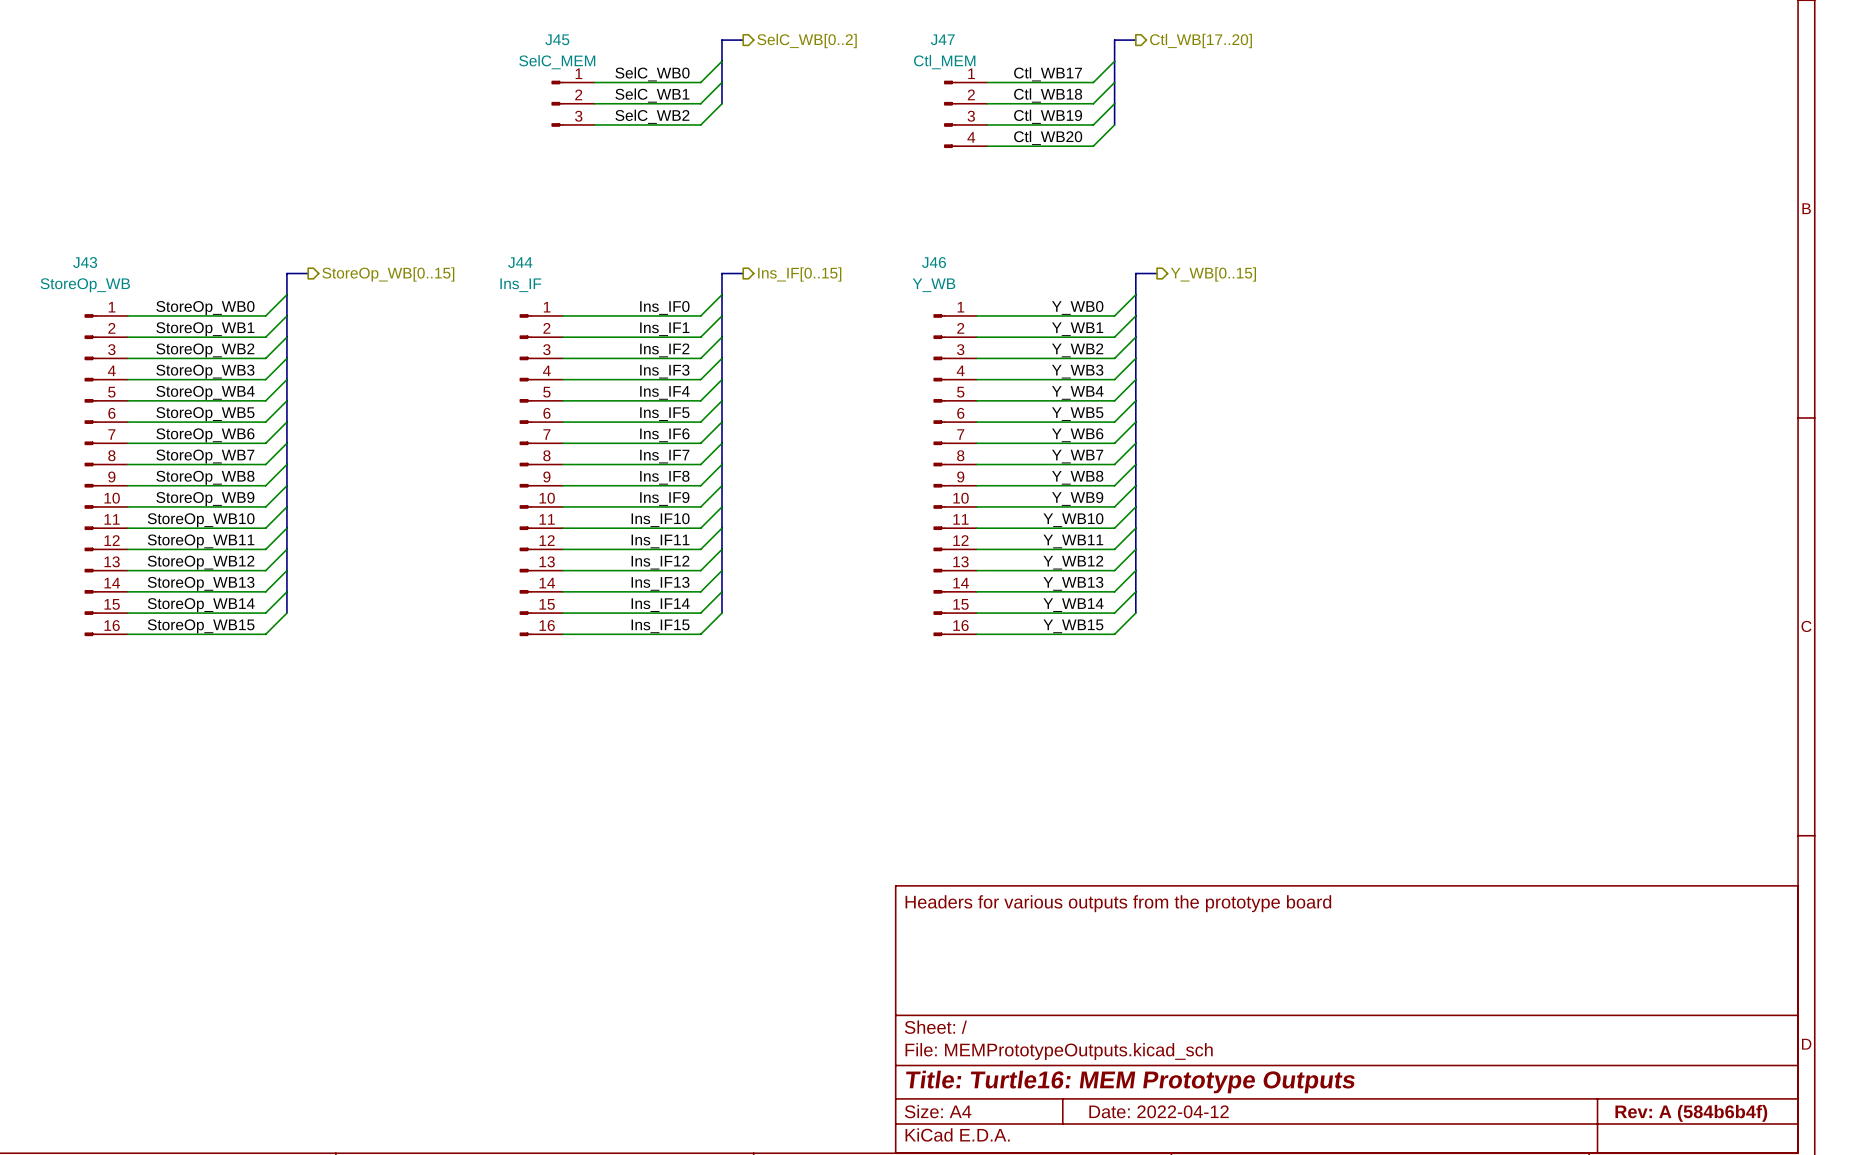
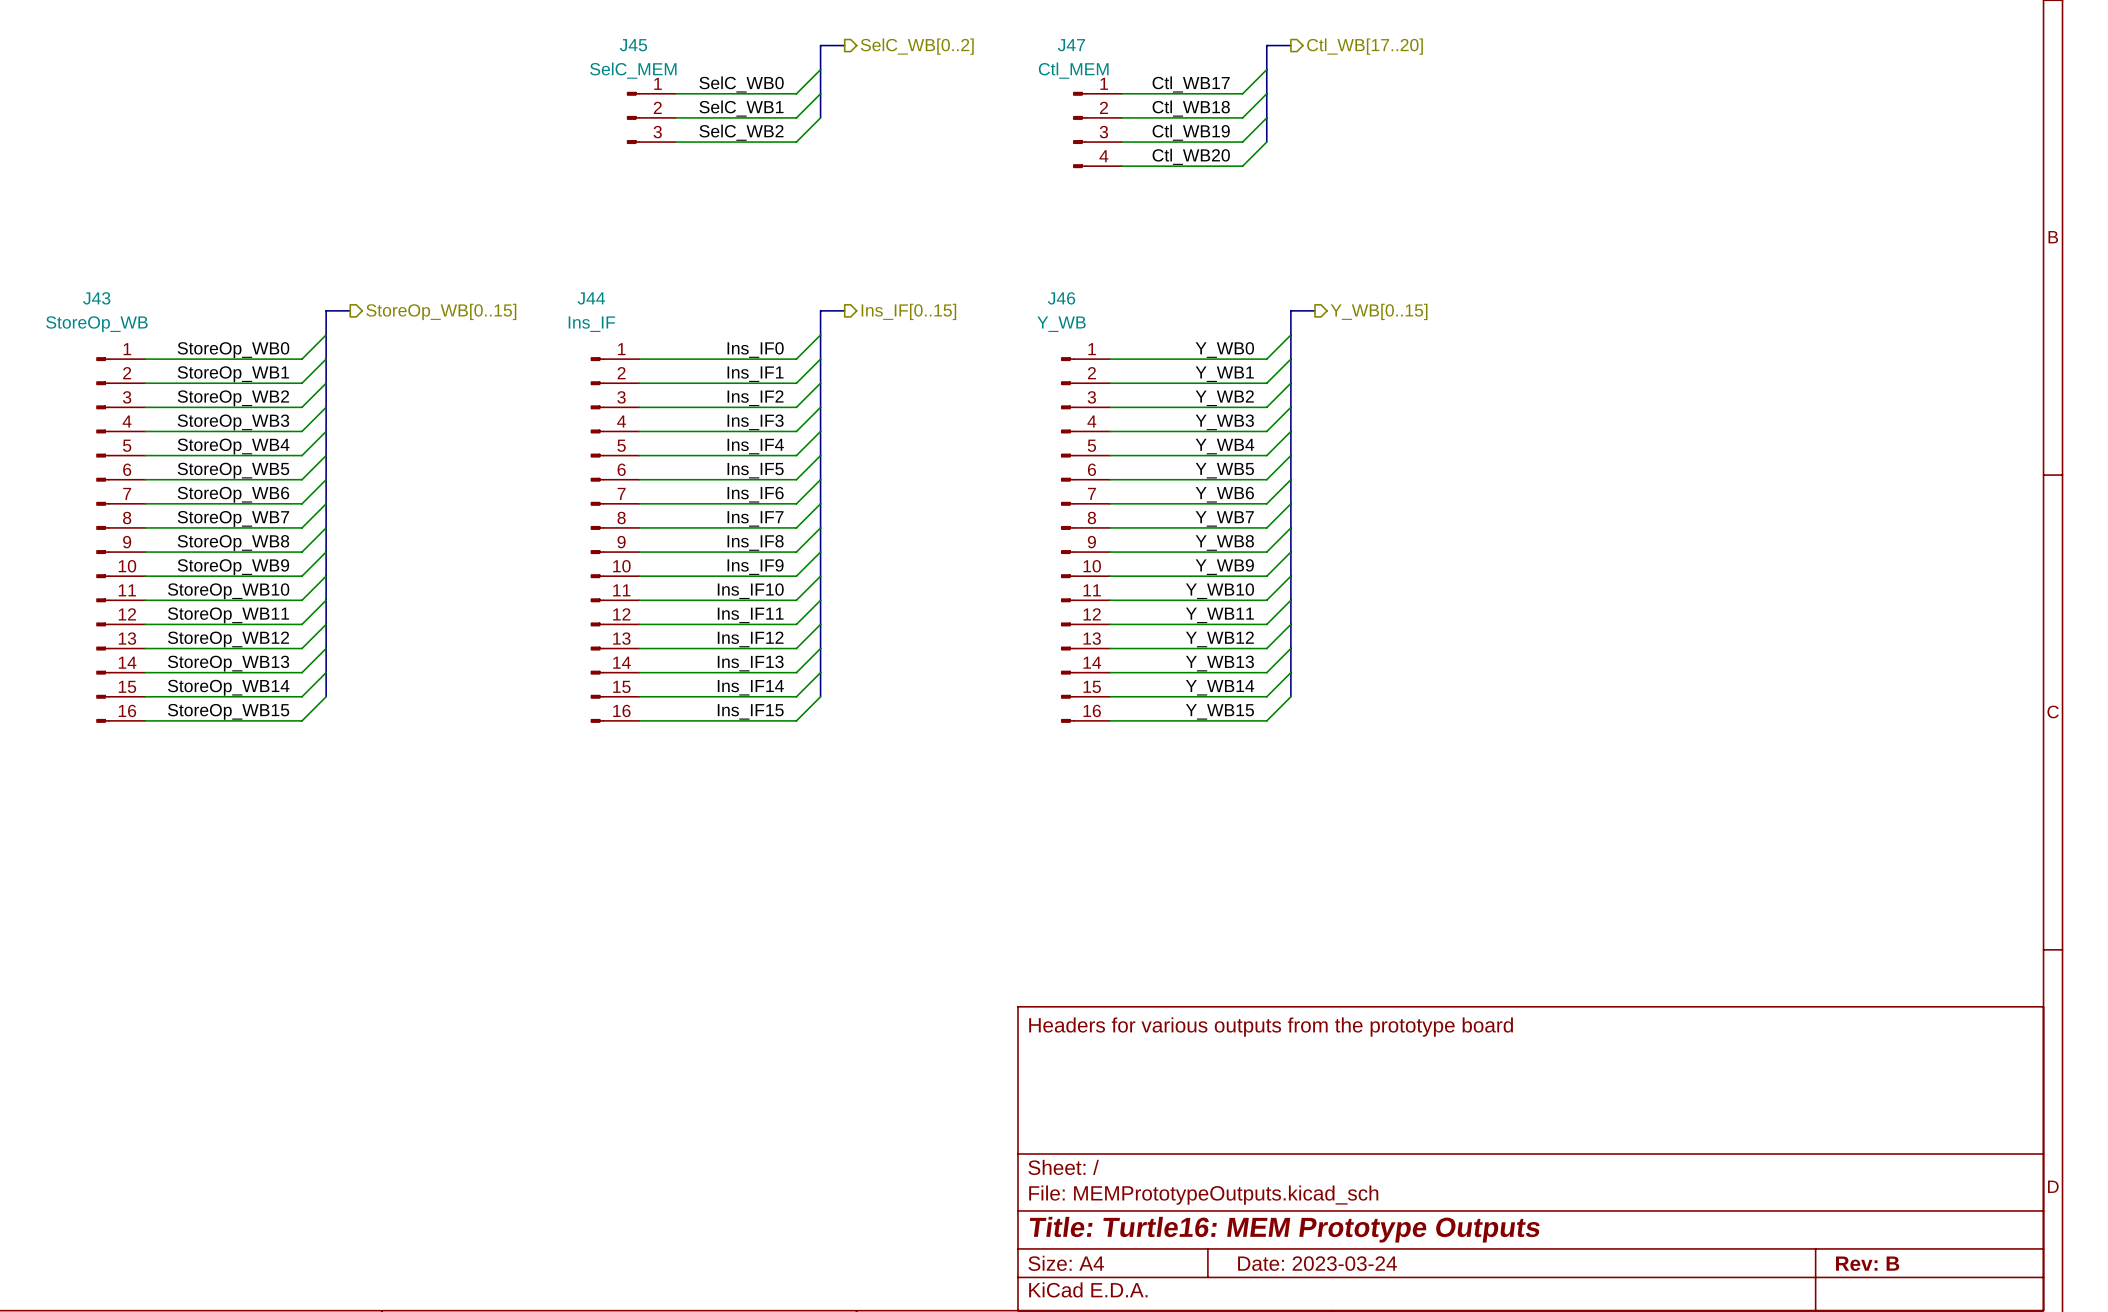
title block: Date: 2022-04-12 (1159, 1111) -> Date: 2023-03-24 (1317, 1263)
title block: Rev: A (584b6b4f) (1691, 1113) -> Rev: B (1867, 1263)

